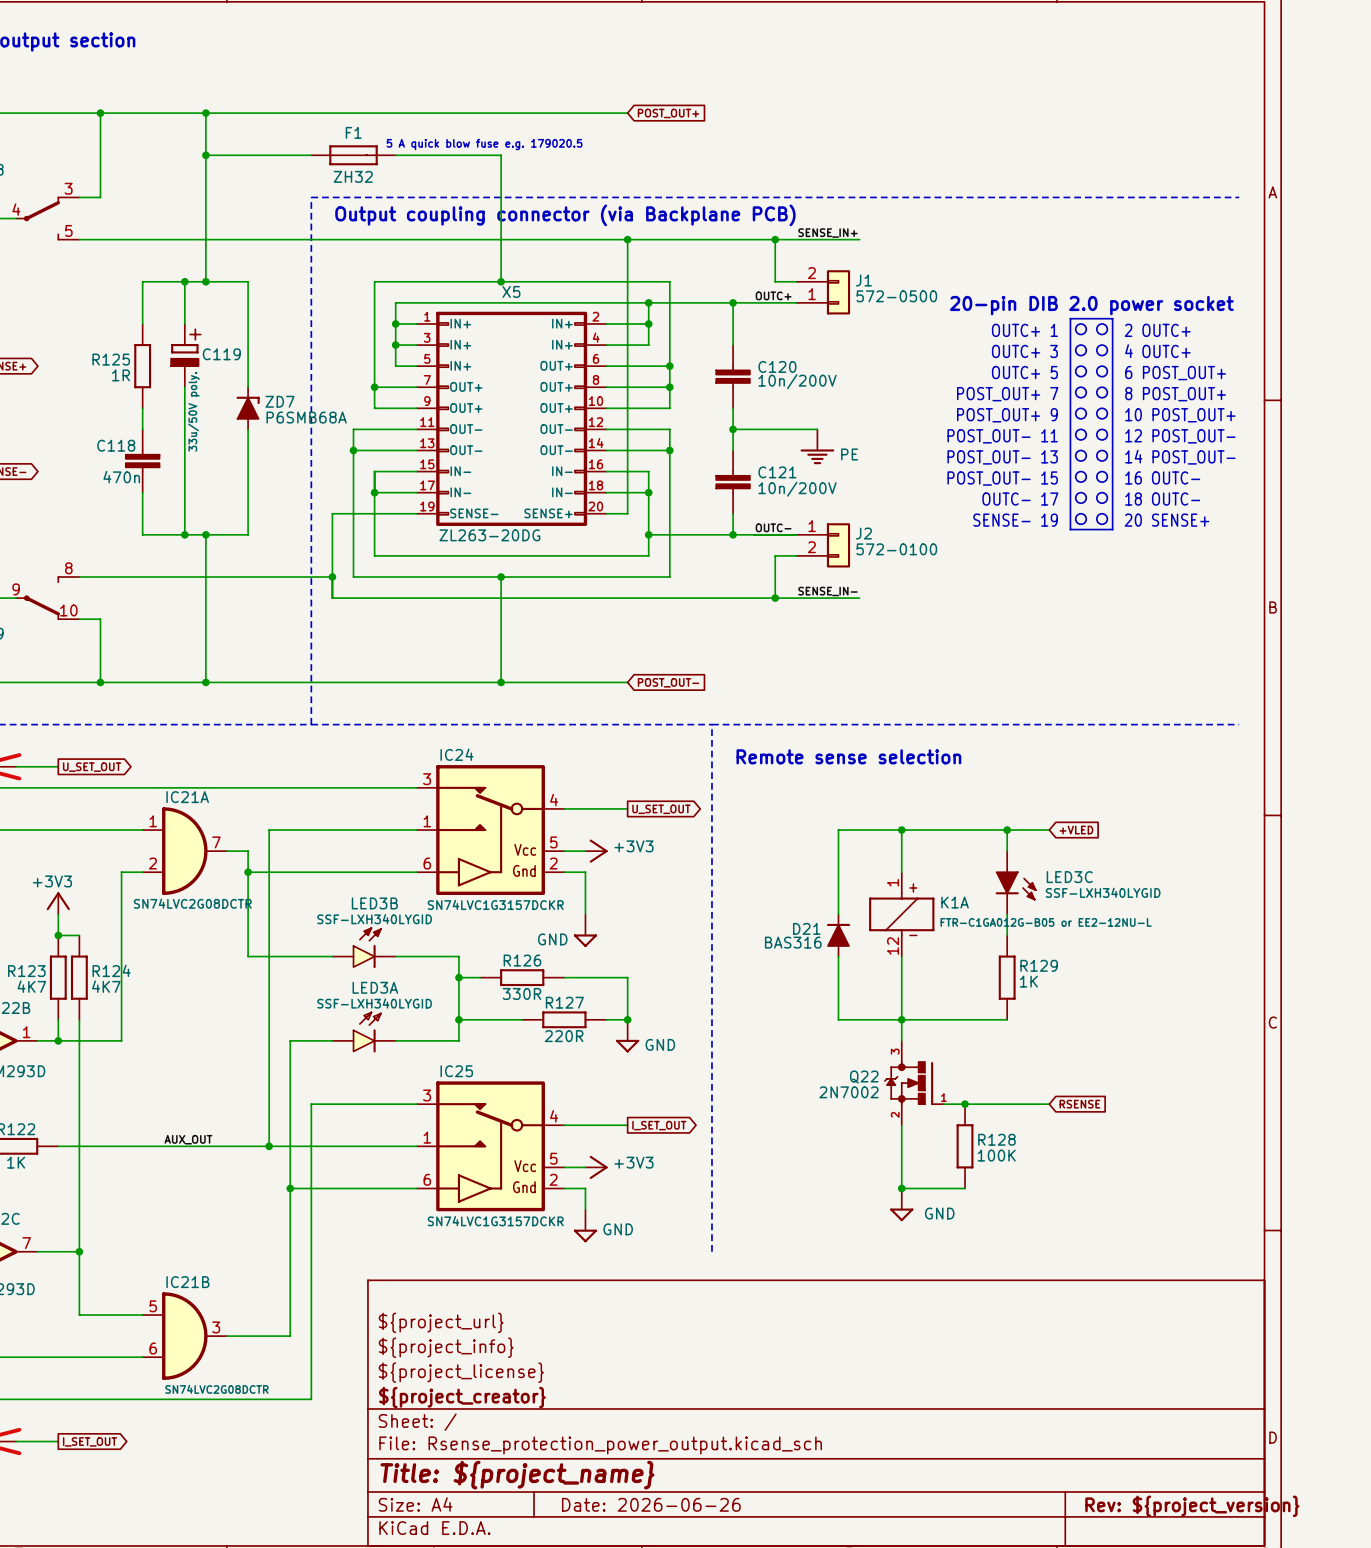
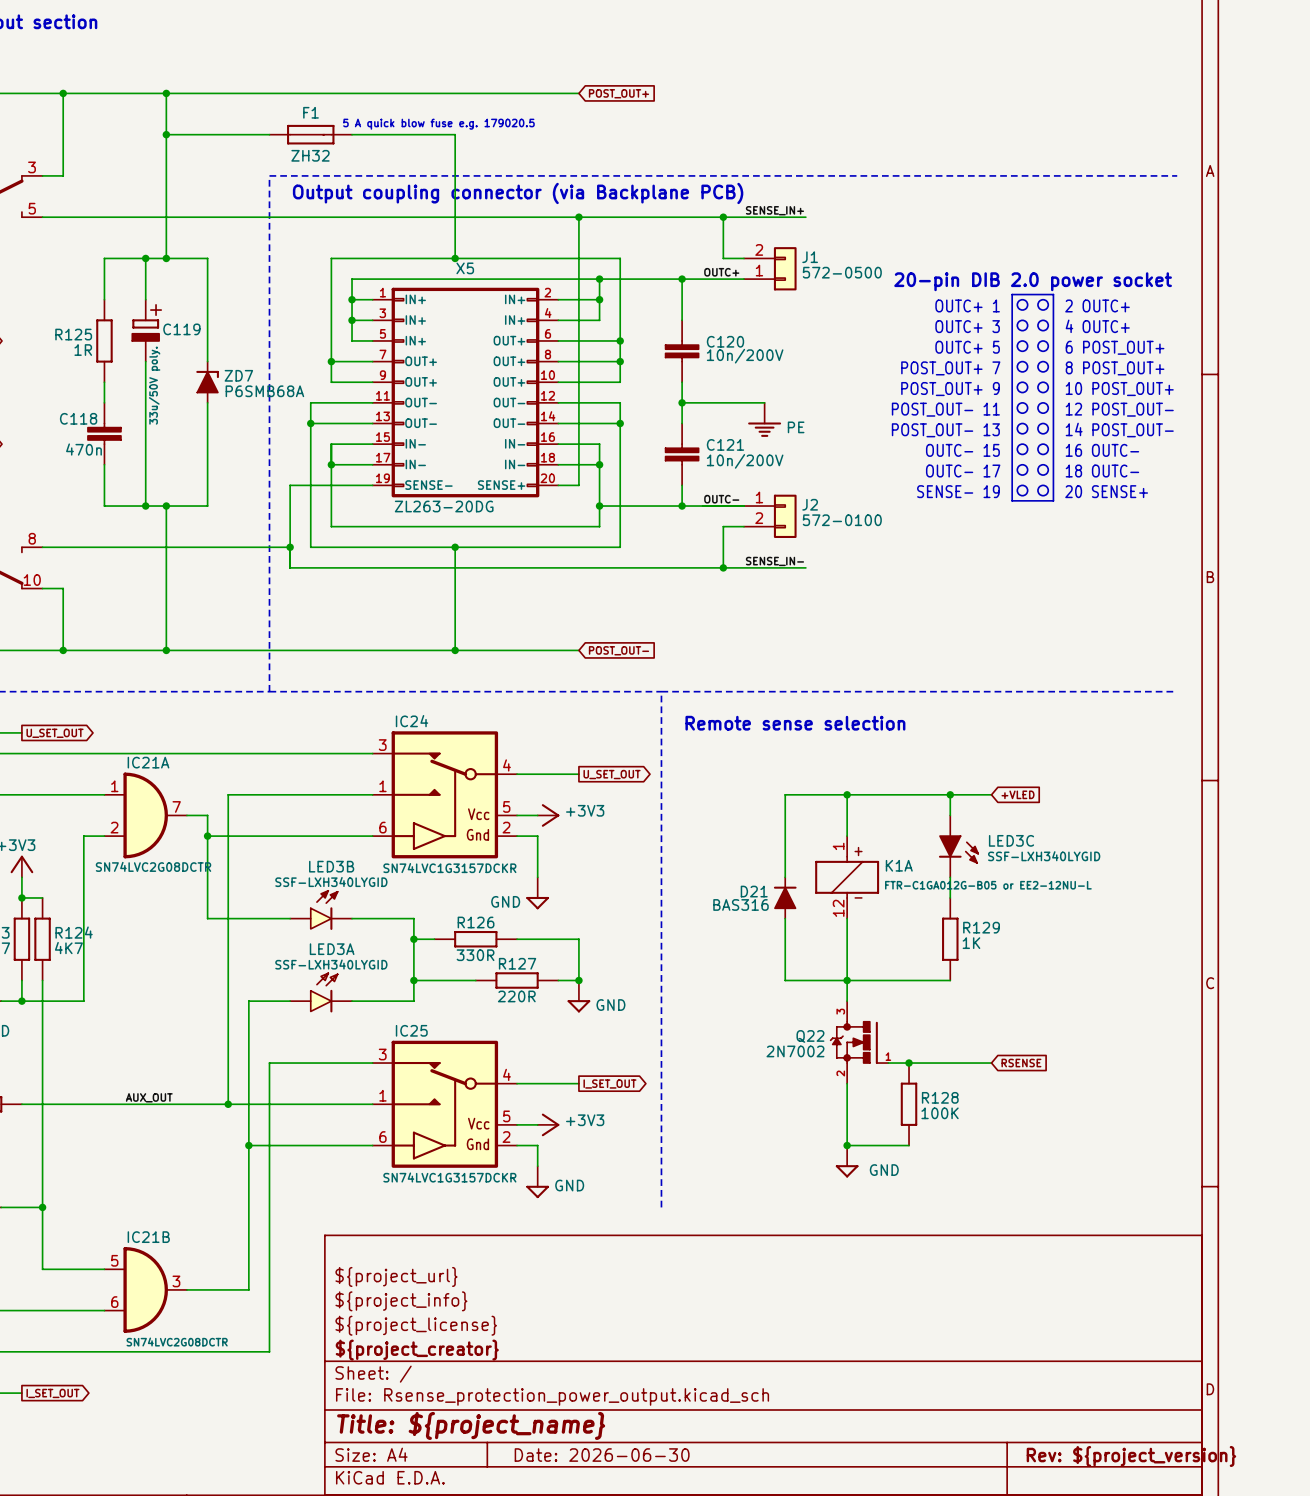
text: POST_OUT- 15 (1002, 478) -> OUTC- 15 (962, 450)
title block: Date: 2026-06-26 (651, 1504) -> Date: 2026-06-30 (602, 1455)

